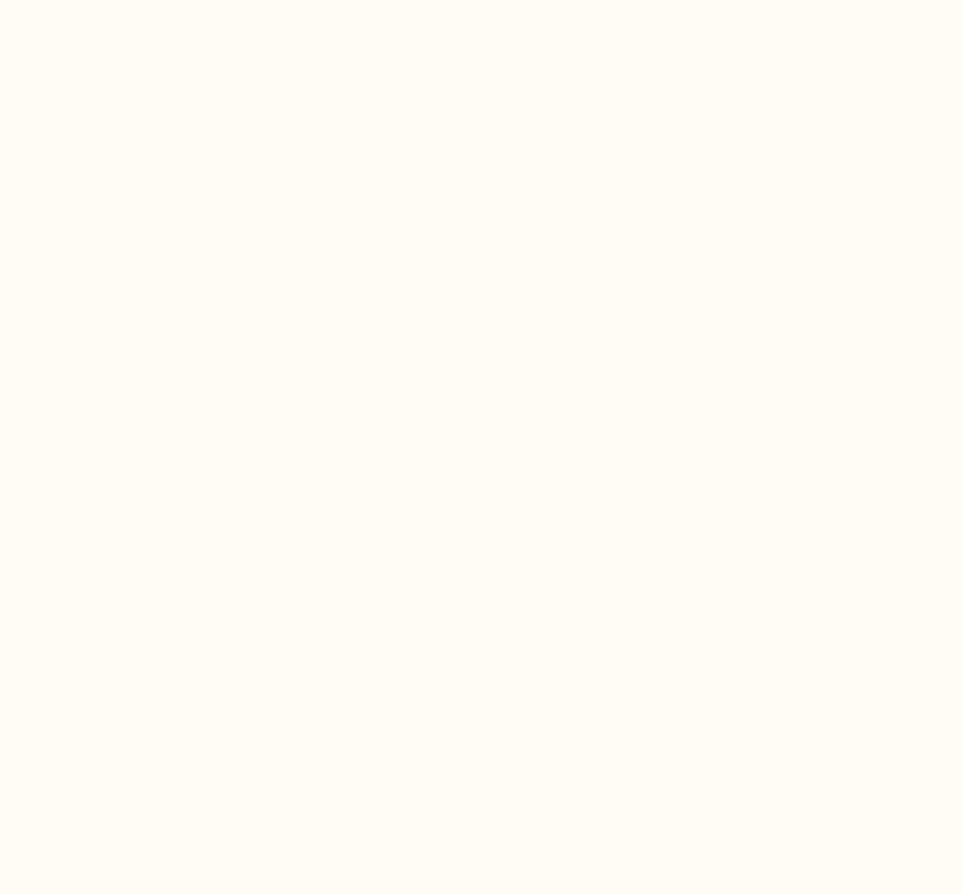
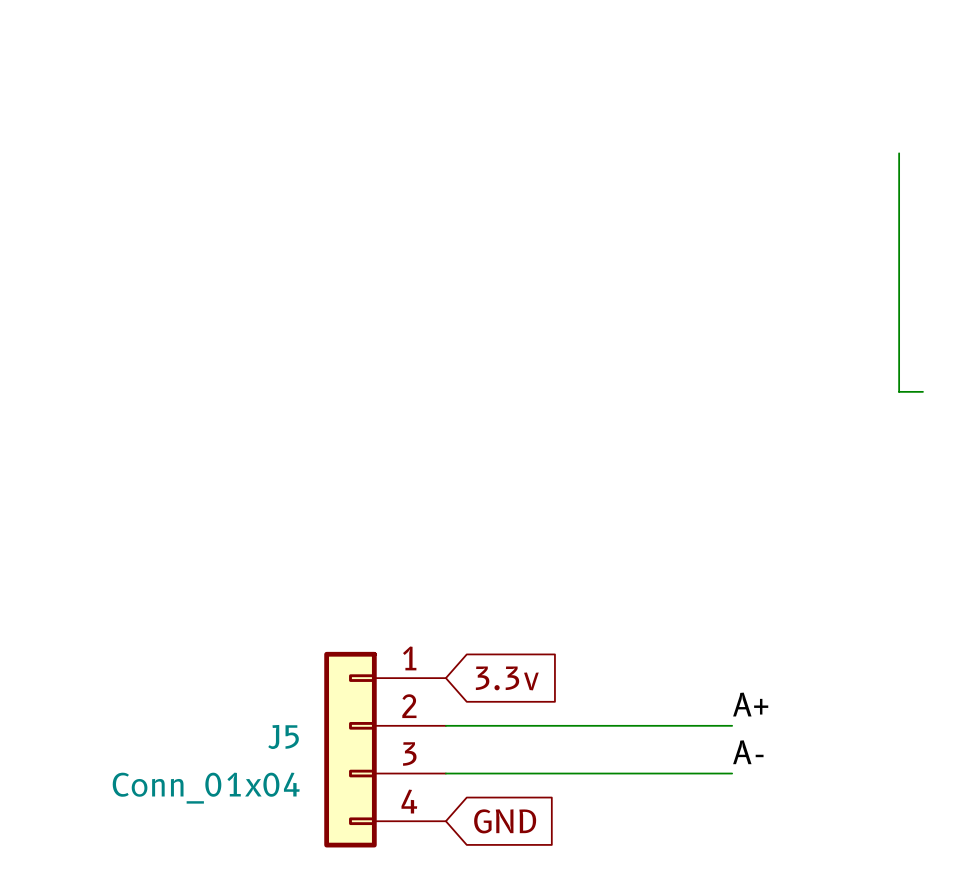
wire: none -> (899, 153) (899, 391) (922, 391)
global label: none -> 3.3v (507, 678)
label: none -> A+ (750, 704)
wire: none -> (445, 725) (732, 725)
J5: none -> Conn_01x04 (385, 749)
label: none -> A- (748, 752)
wire: none -> (445, 773) (732, 773)
global label: none -> GND (505, 821)

